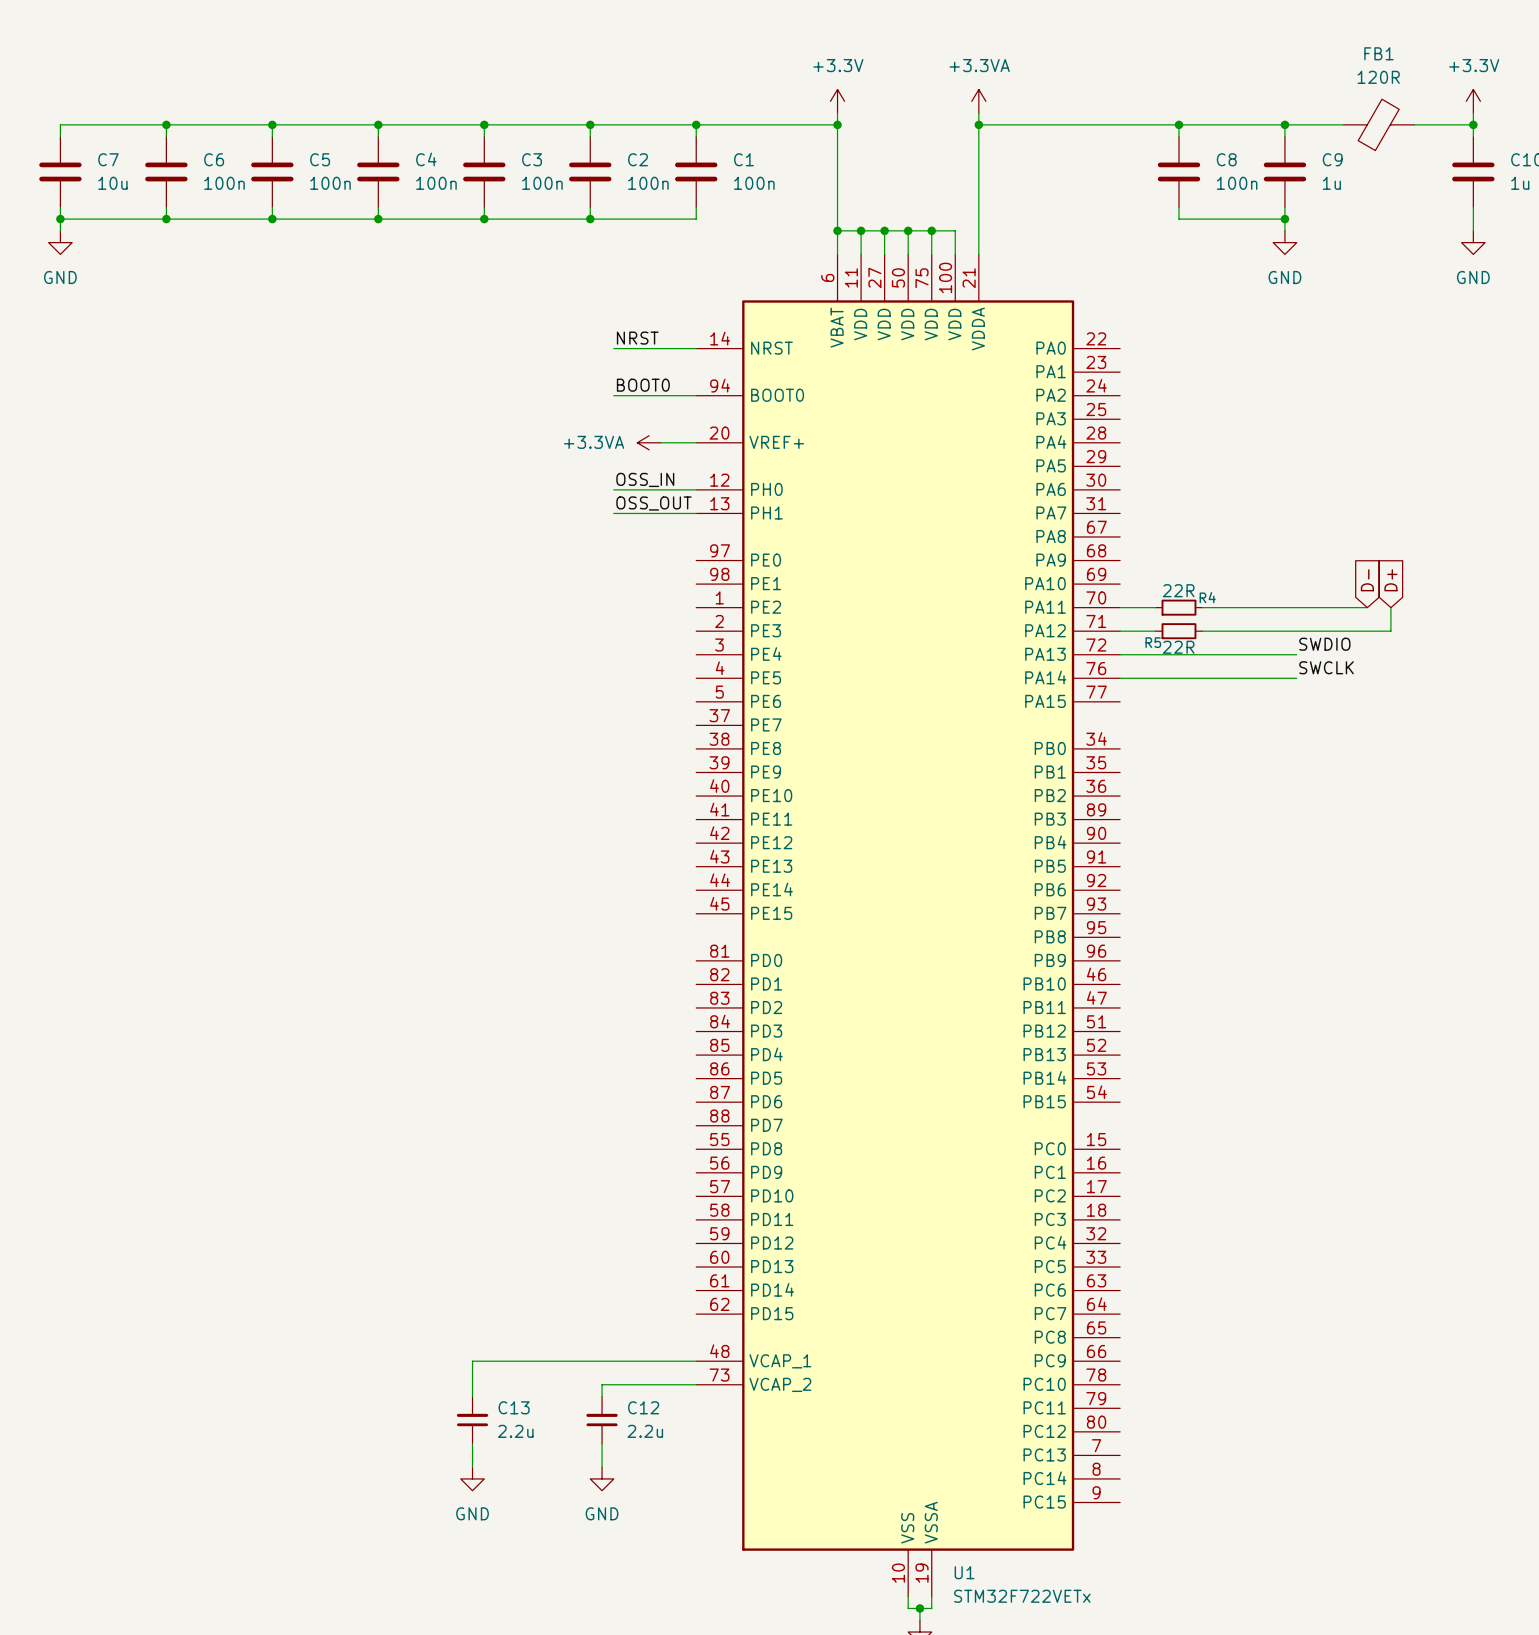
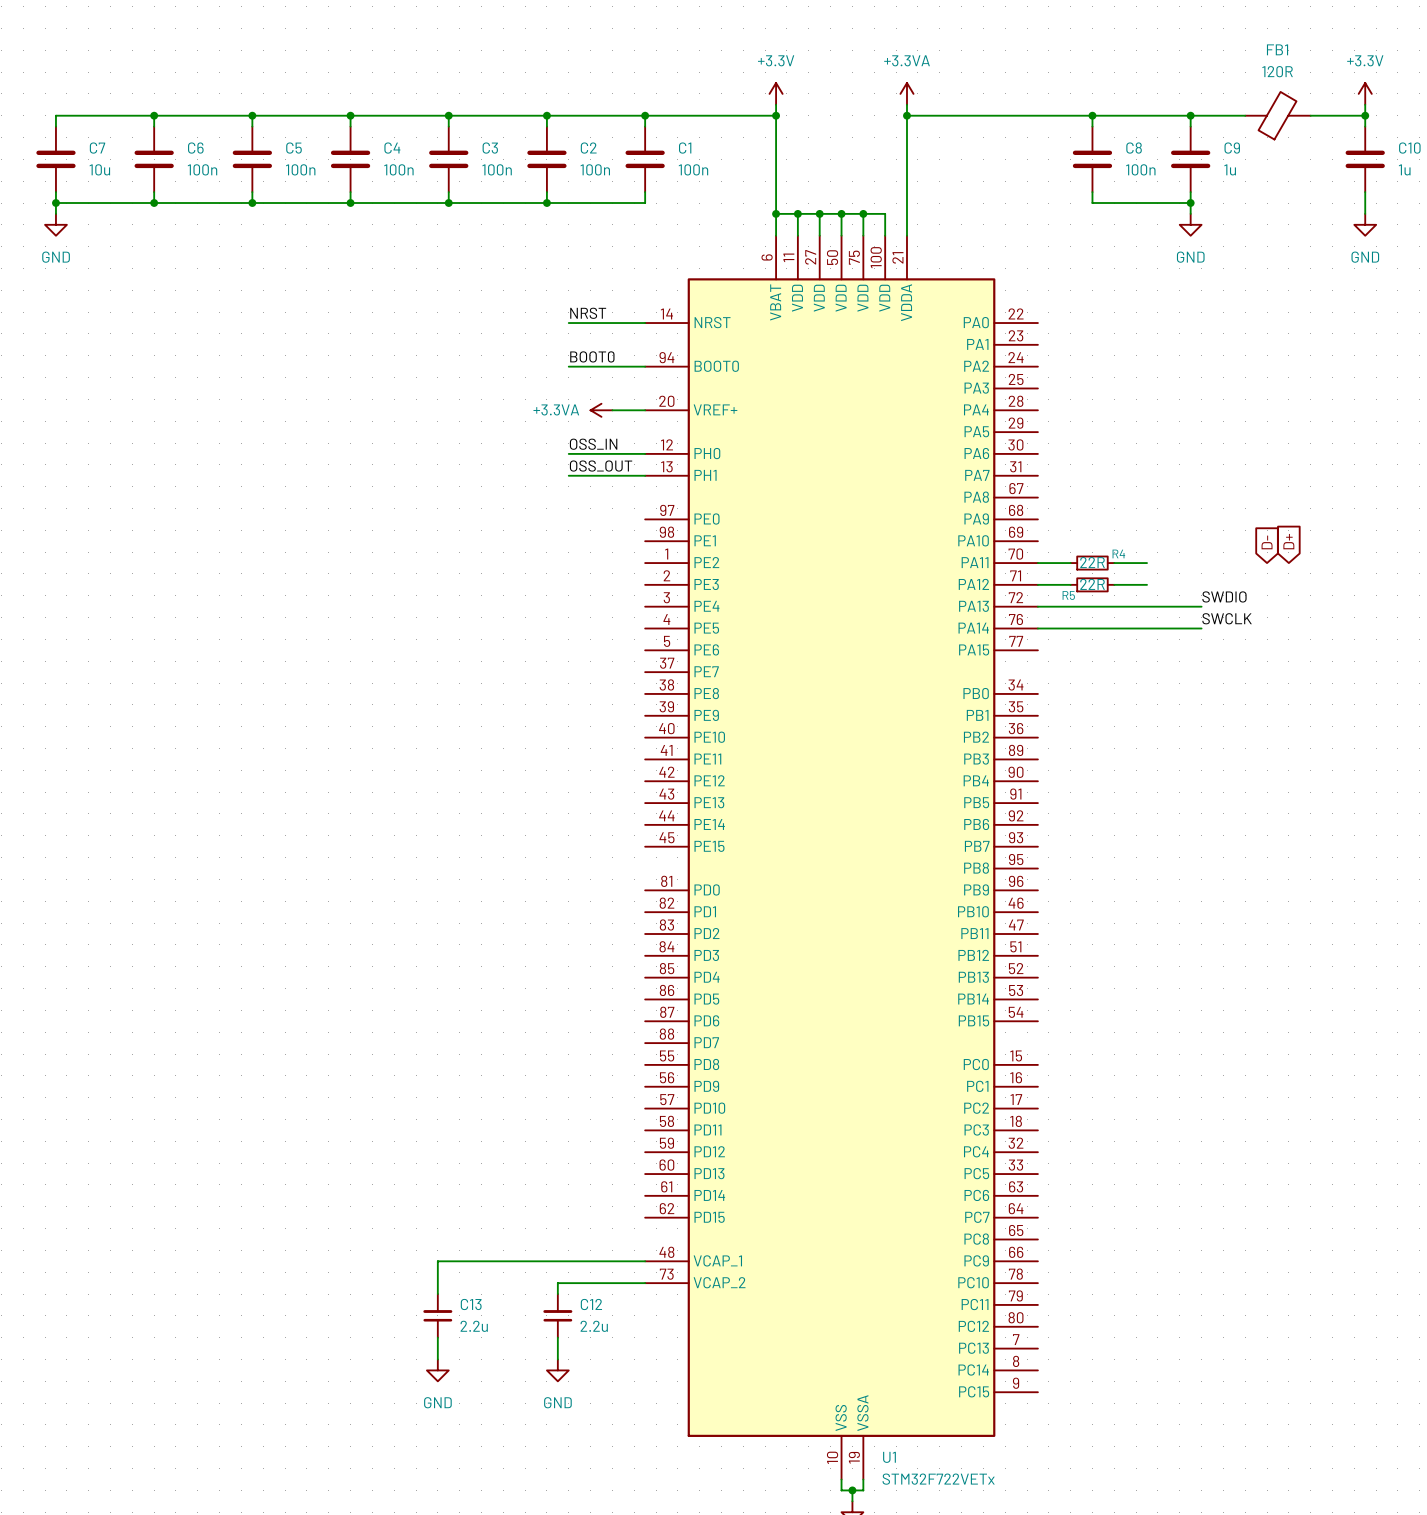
R4 value position: 22R (1178, 590) -> 22R (1092, 562)
wire: (1237, 607) (1367, 607) -> none
wire: (1390, 607) (1390, 631) (1237, 631) -> none
R5 value position: 22R (1178, 647) -> 22R (1092, 584)

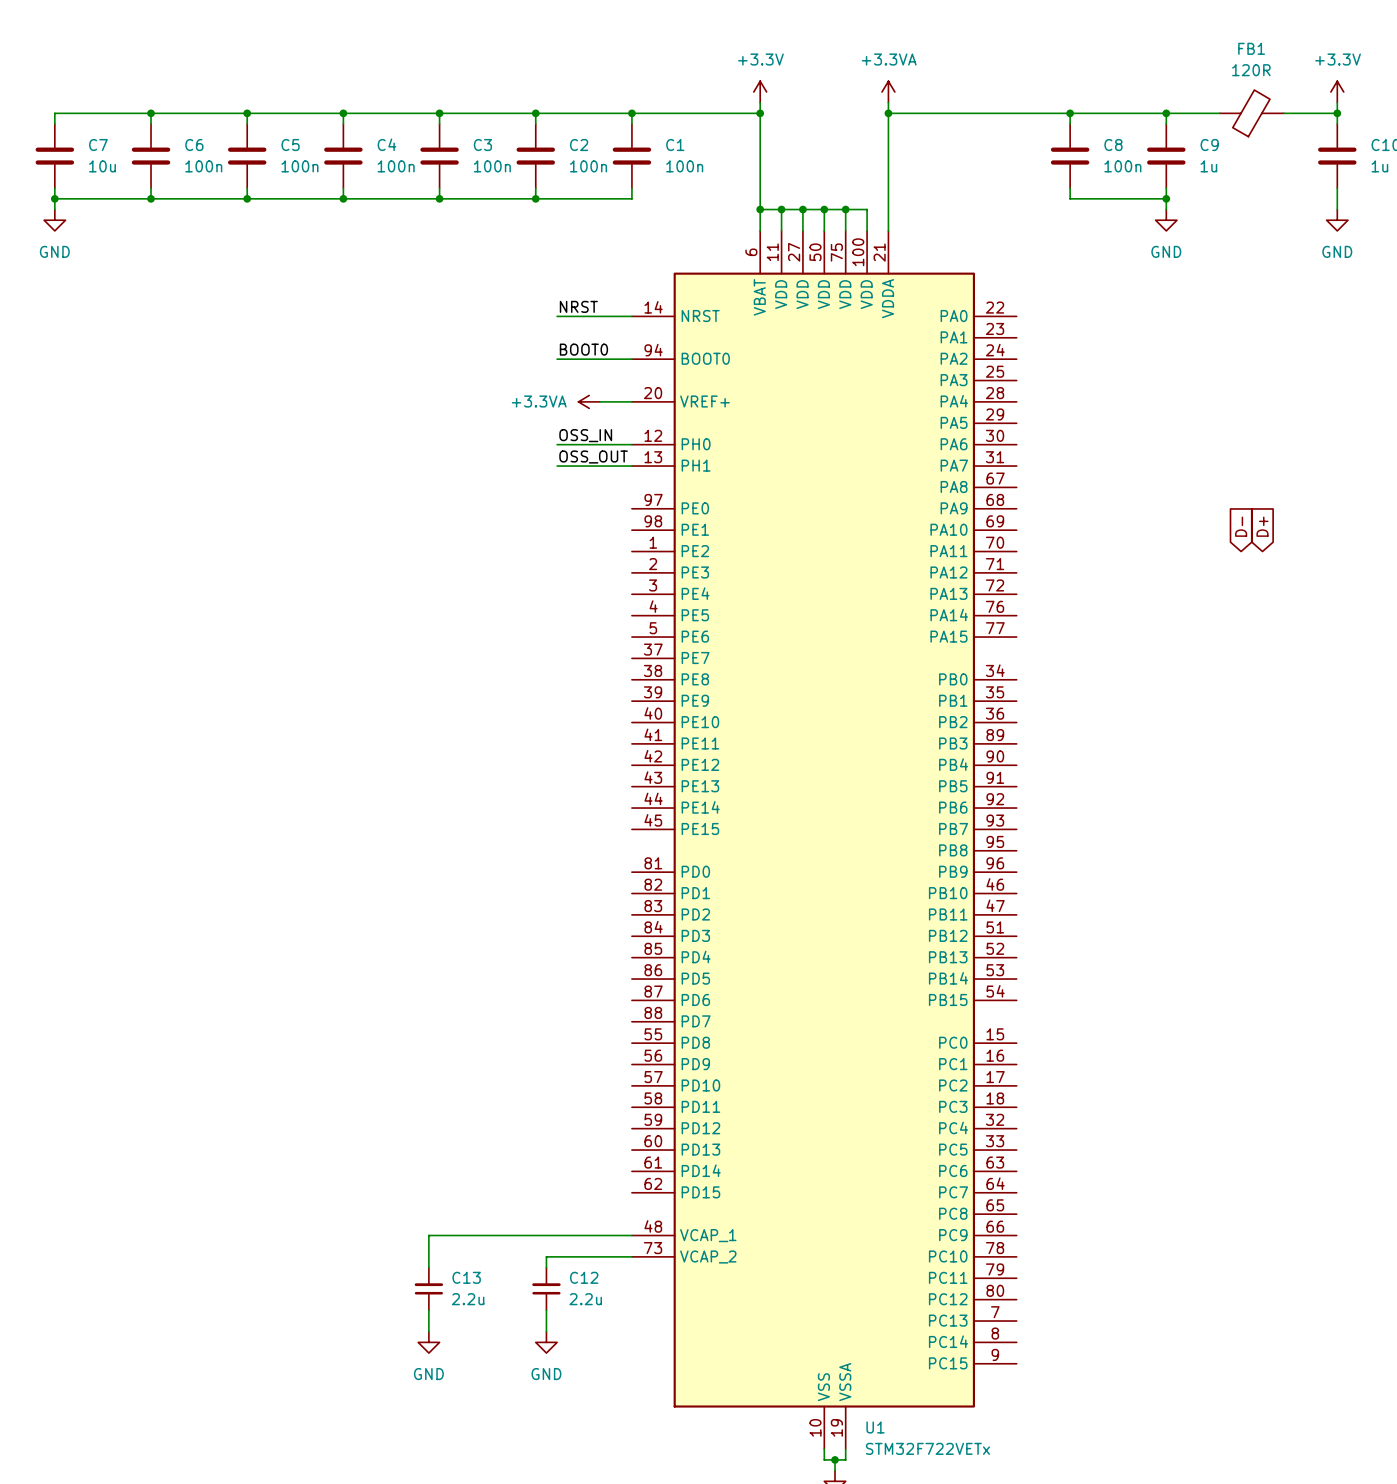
wire: (1037, 563) (1070, 563) -> none
R4: 22R (1092, 563) -> none
wire: (1114, 563) (1147, 563) -> none
wire: (1037, 584) (1070, 584) -> none
R5: 22R (1092, 584) -> none
wire: (1114, 584) (1147, 584) -> none
label: SWDIO (1224, 596) -> none
wire: (1037, 606) (1201, 606) -> none
label: SWCLK (1227, 618) -> none
wire: (1037, 628) (1201, 628) -> none

